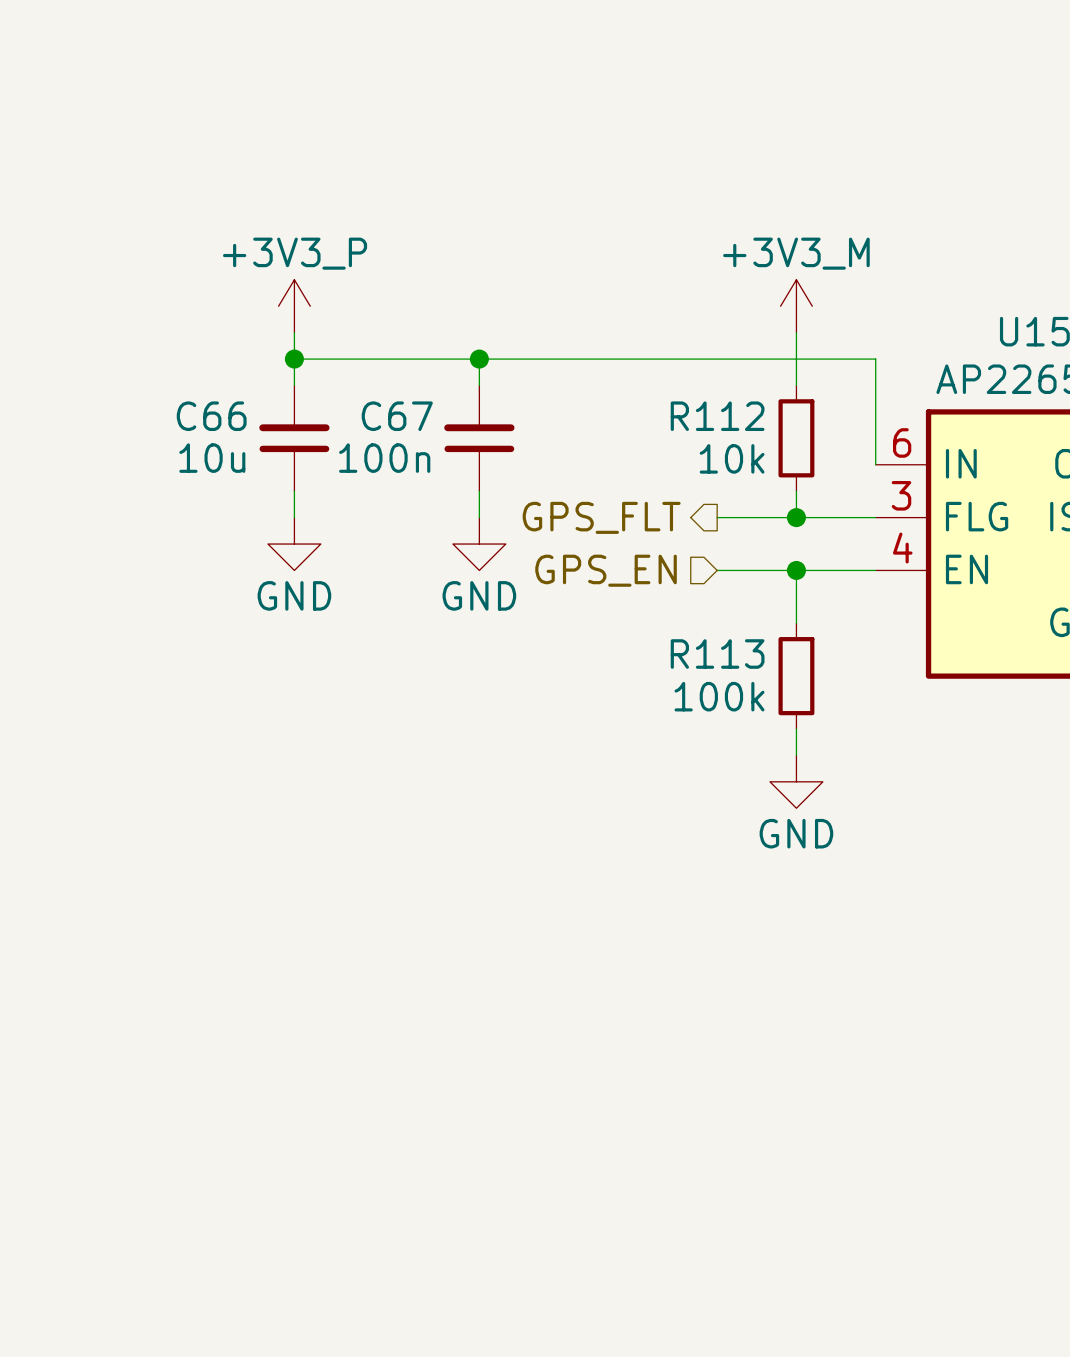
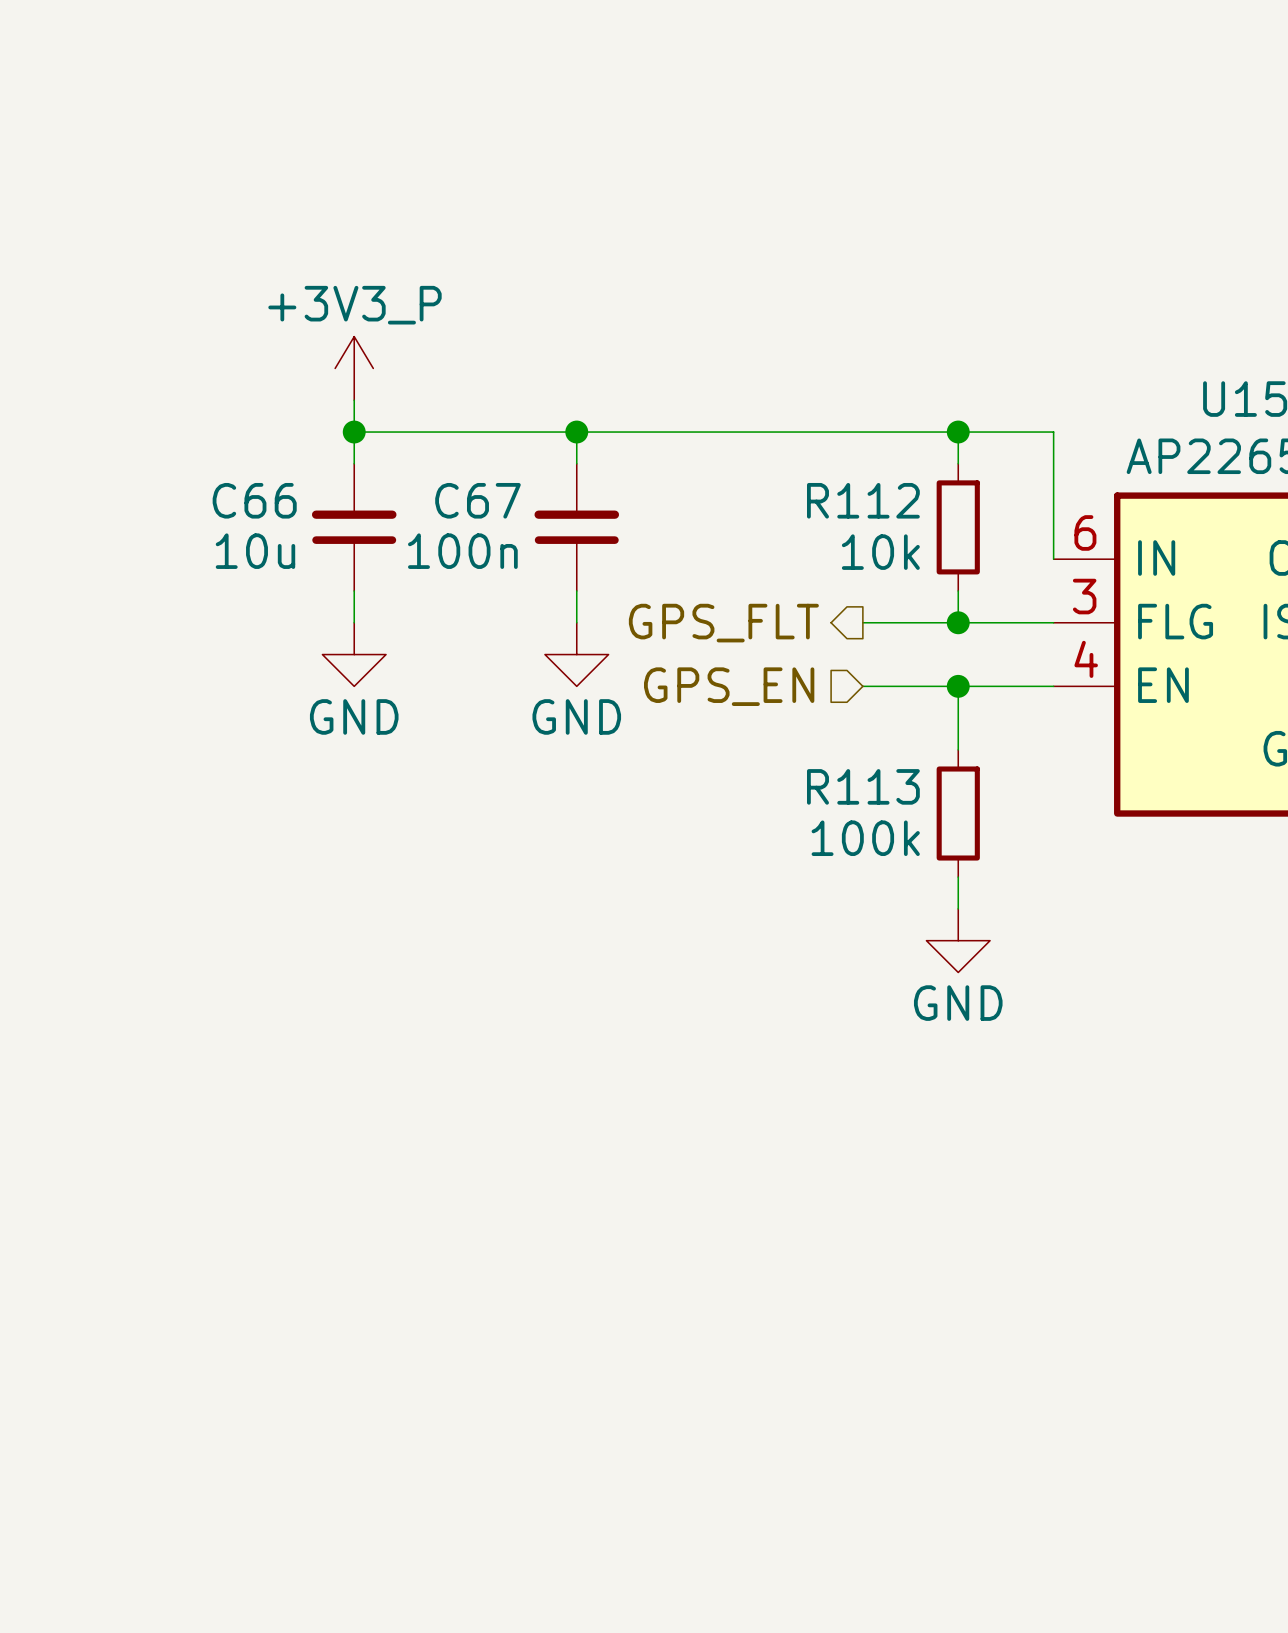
power symbol: +3V3_M (796, 306) -> none
wire: (796, 332) (796, 359) -> none
junction: none -> (958, 432)

